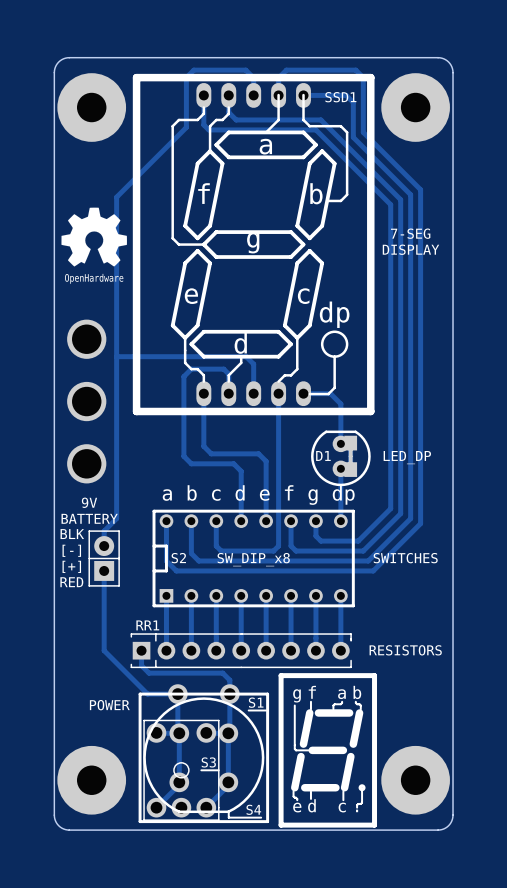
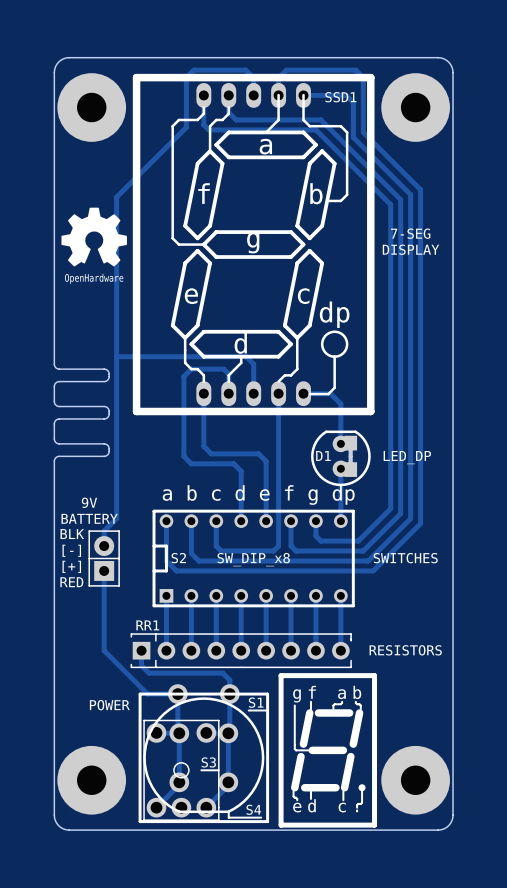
part: (86, 339) -> none
board edge: (54, 364) (54, 386) -> (54, 364) (58, 369) (104, 369) (109, 374) (108, 379) (105, 381) (58, 381) (54, 386)
board edge: (54, 401) (54, 423) -> (54, 401) (58, 406) (104, 406) (109, 411) (108, 416) (105, 418) (58, 419) (54, 423)
part: (86, 401) -> none
board edge: (54, 438) (54, 461) -> (54, 438) (58, 443) (104, 443) (109, 448) (108, 453) (105, 456) (58, 456) (54, 461)
part: (86, 463) -> none

